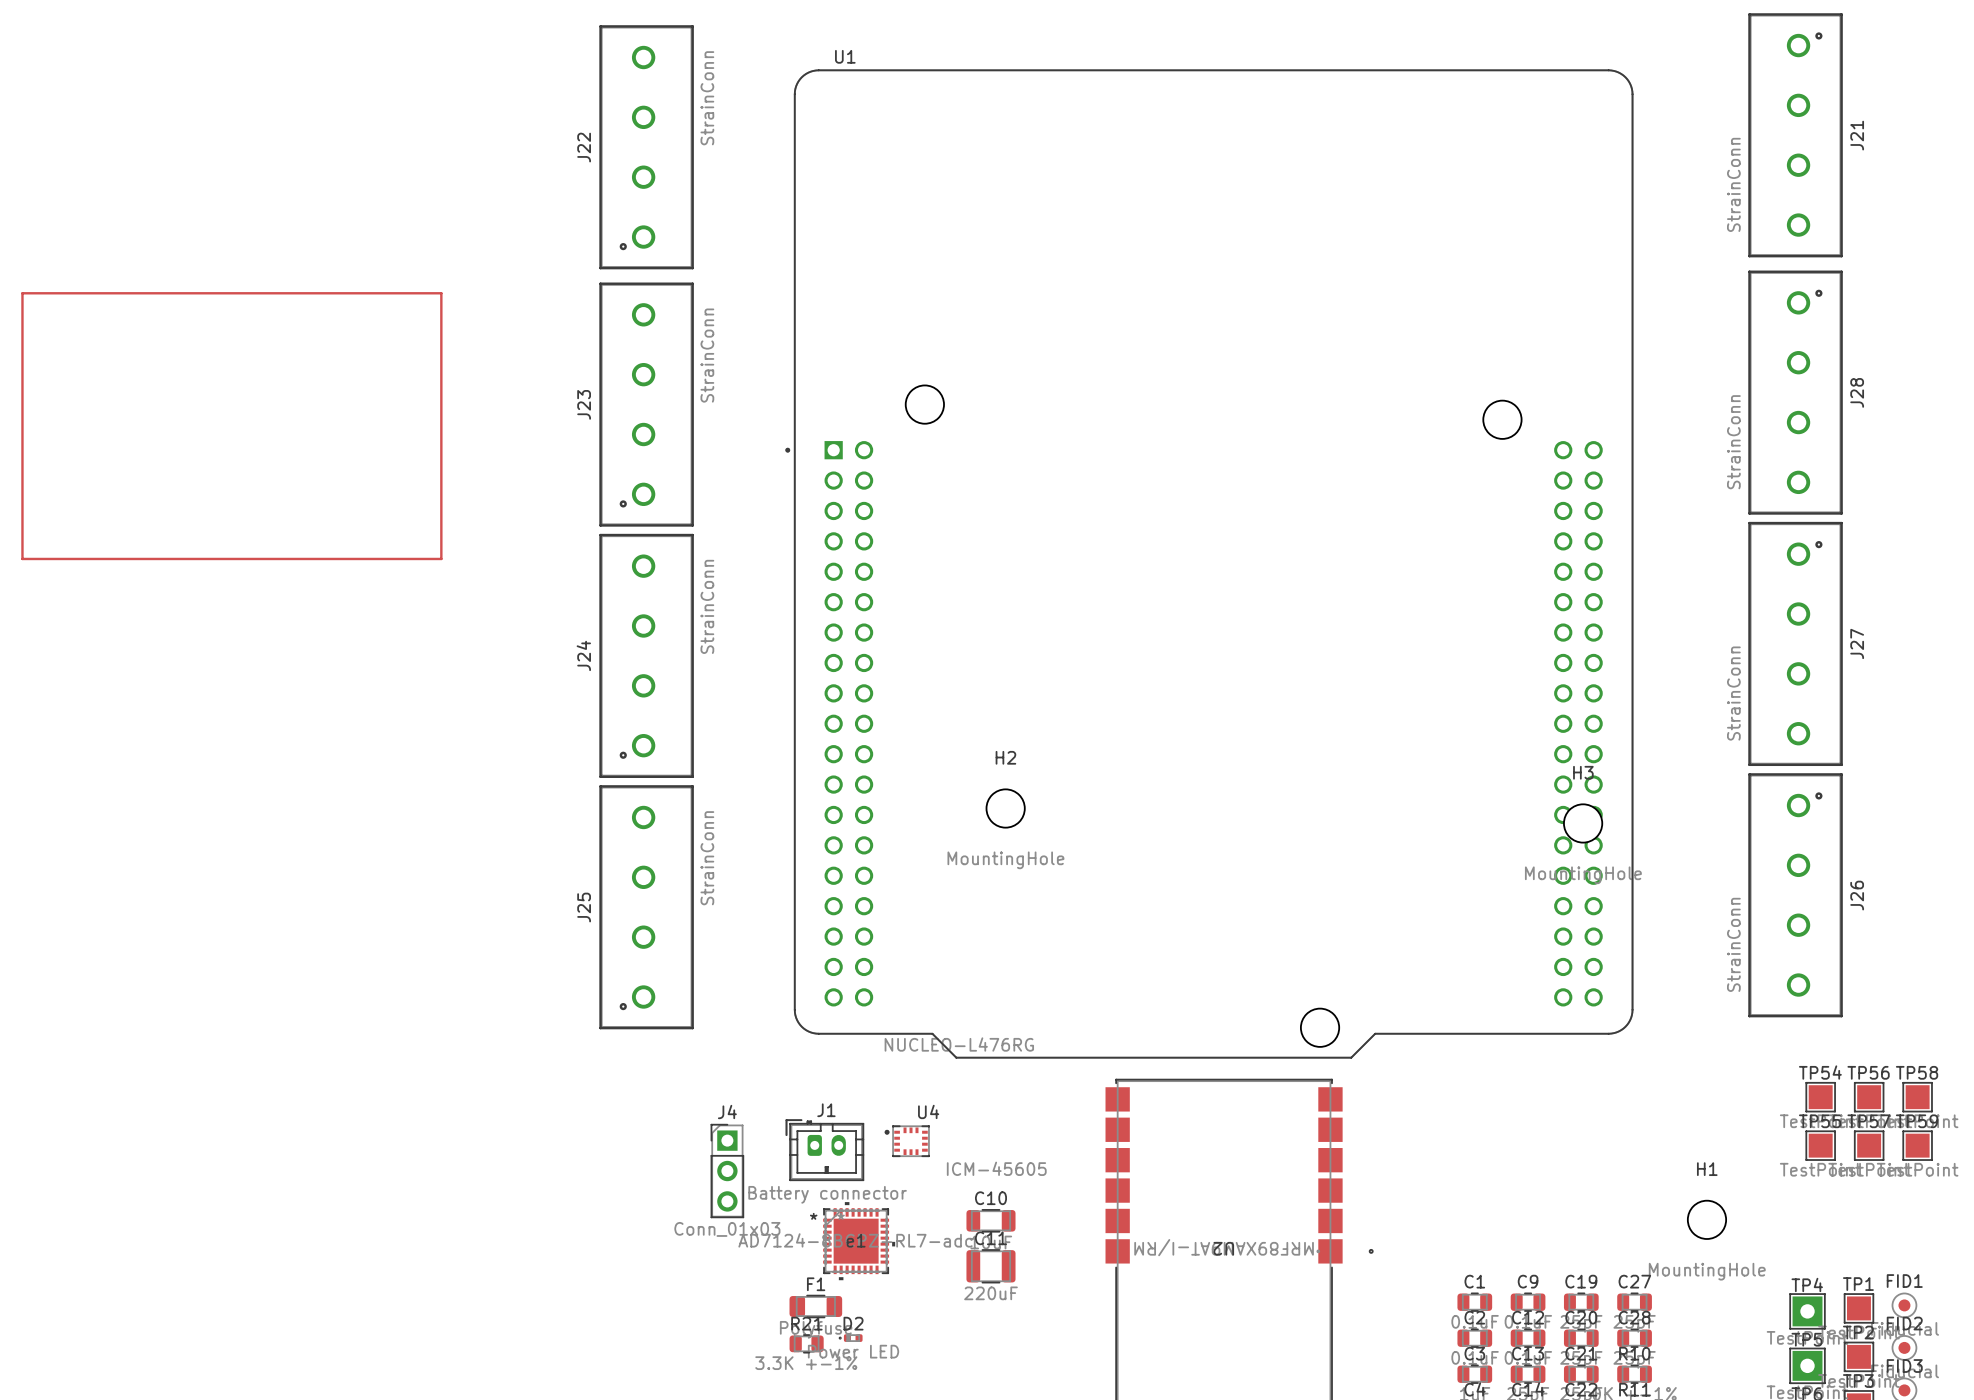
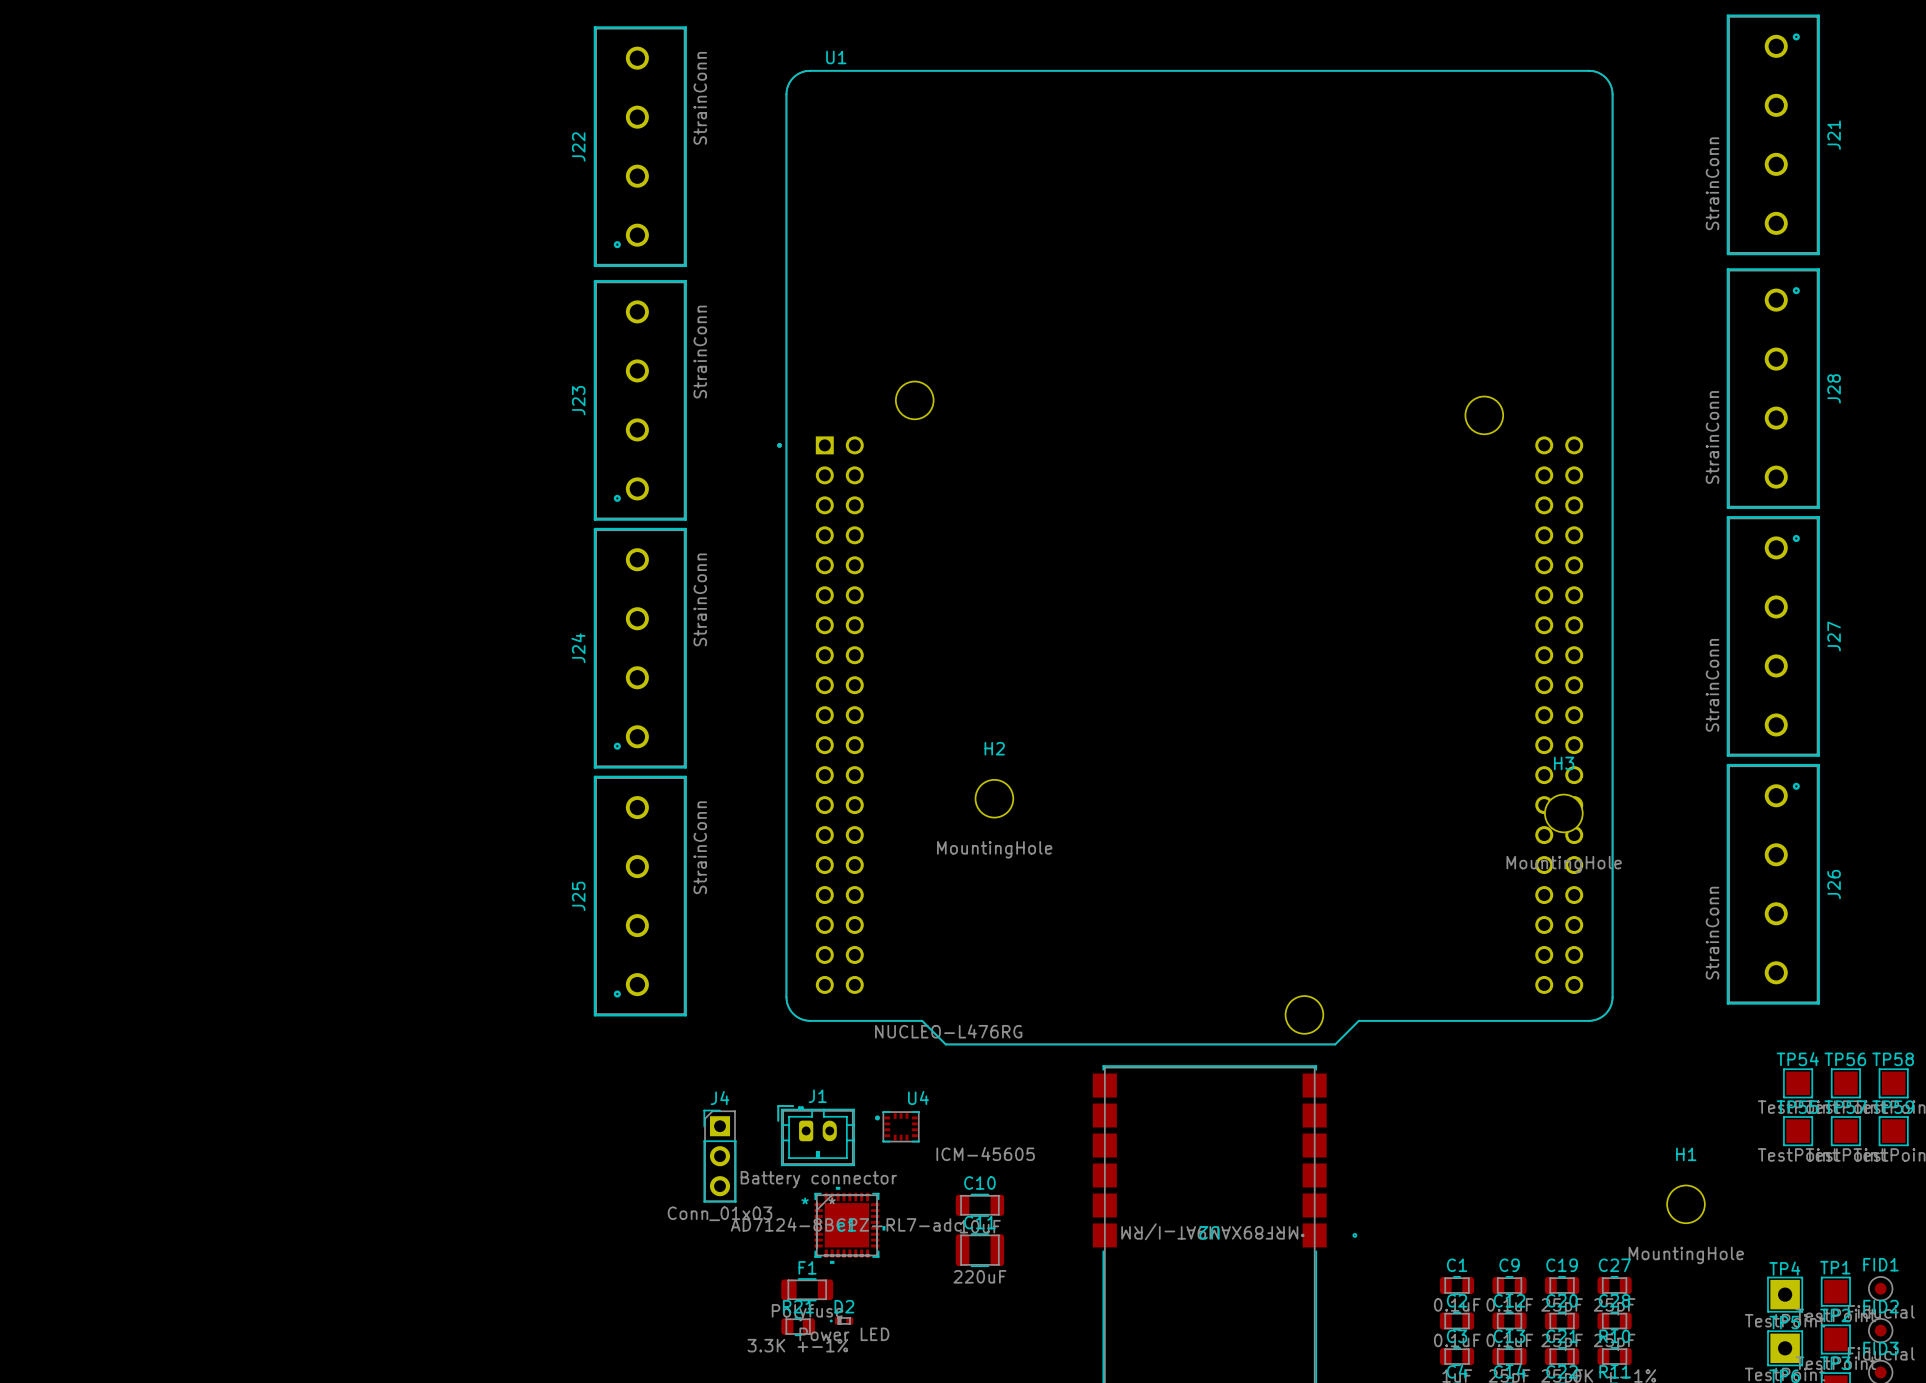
top track: (22, 293) (441, 293) (441, 558) (22, 558) (22, 293) -> none

